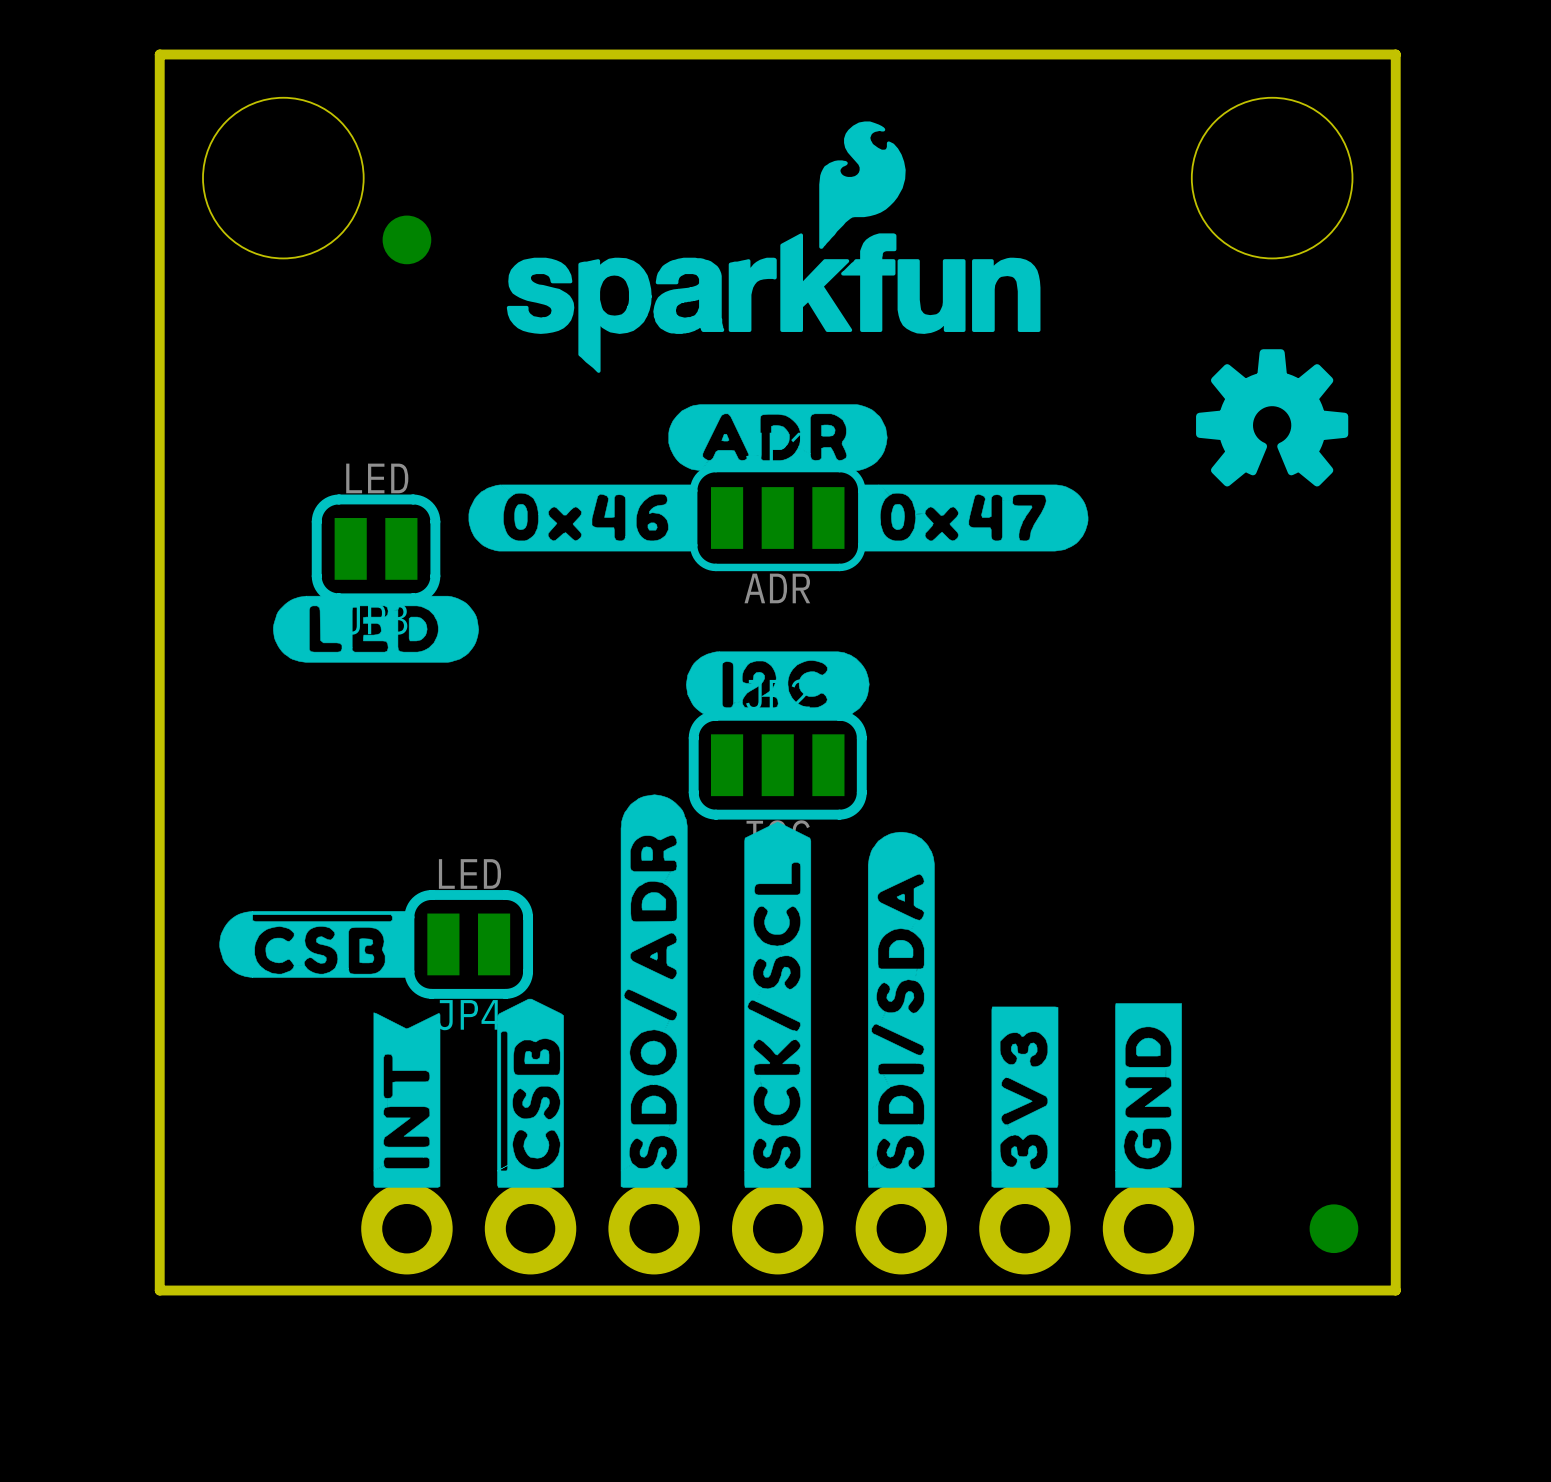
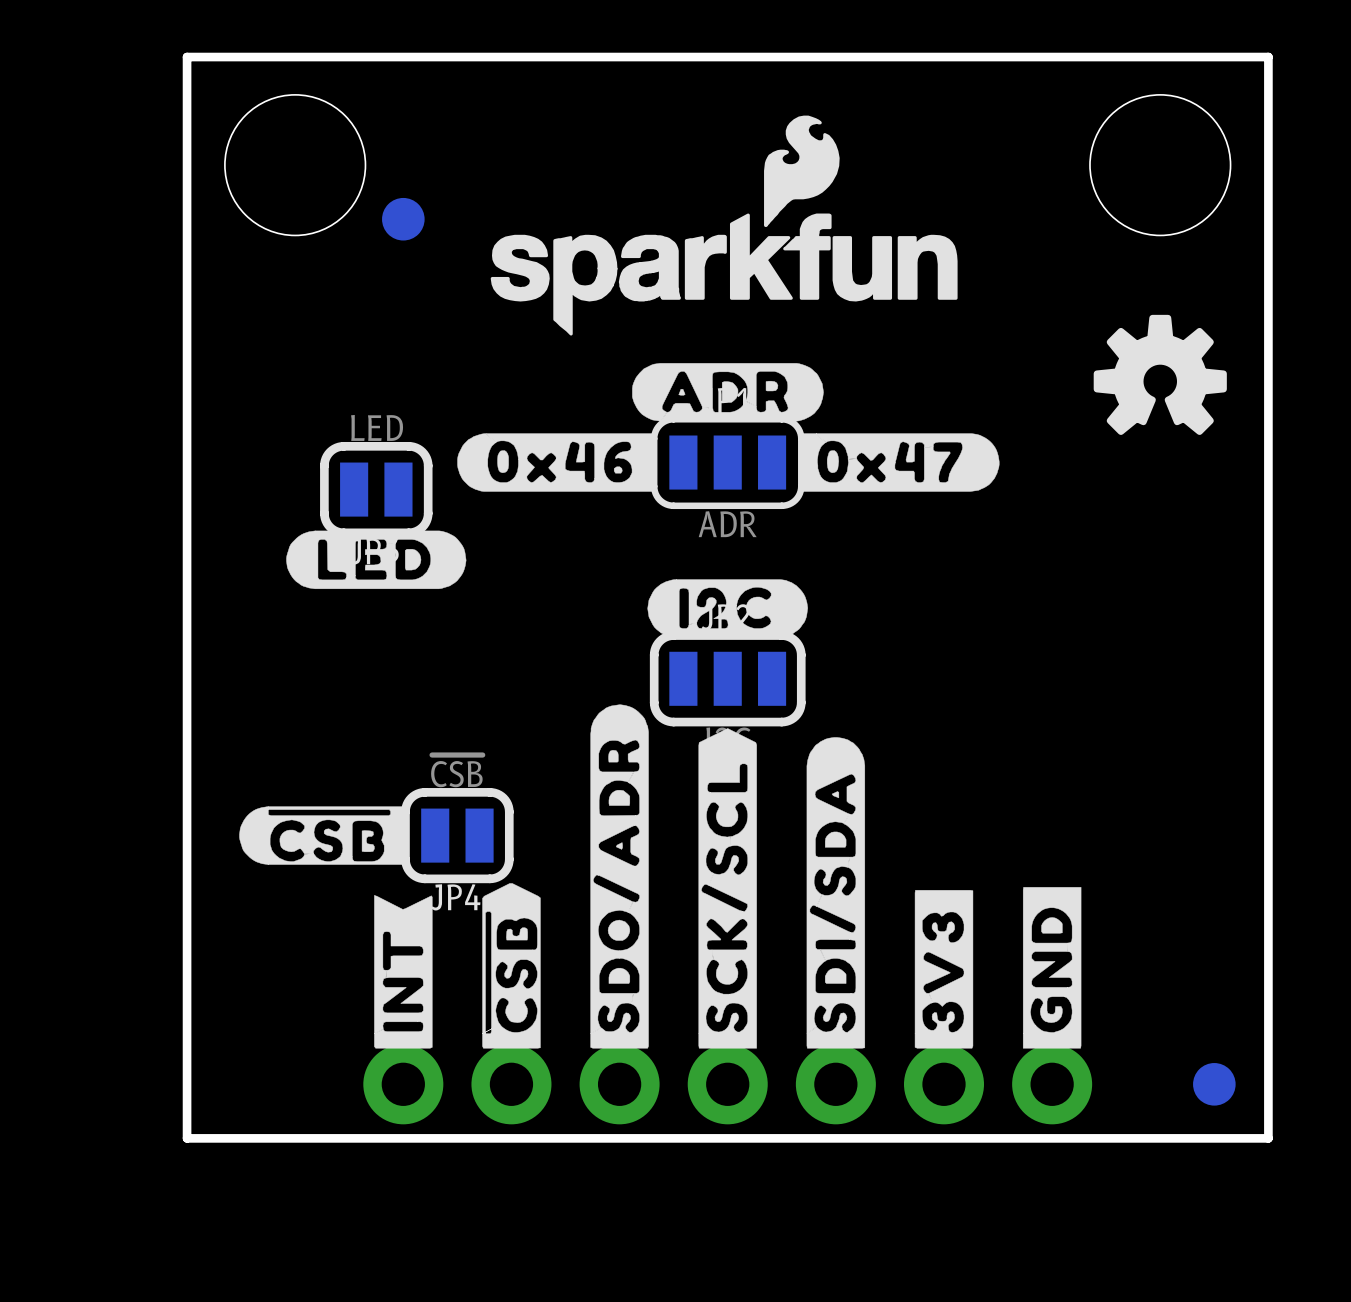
JP4 value: LED (469, 873) -> ~{CSB} (456, 771)

